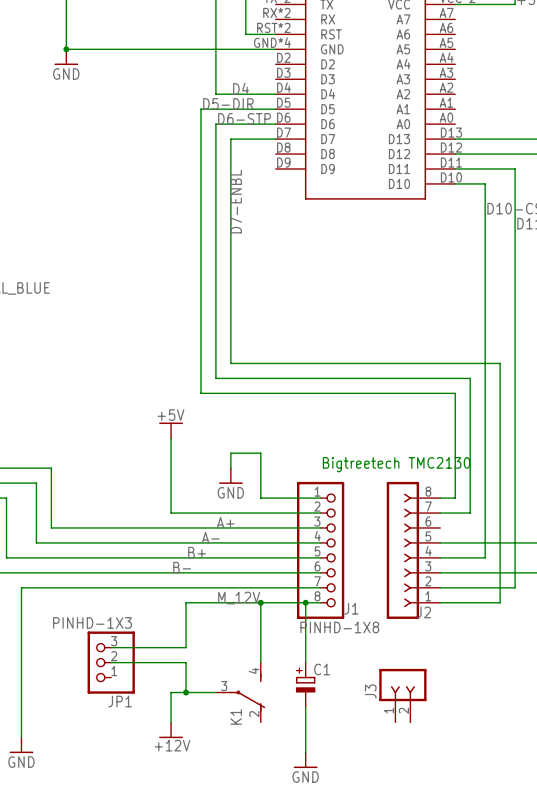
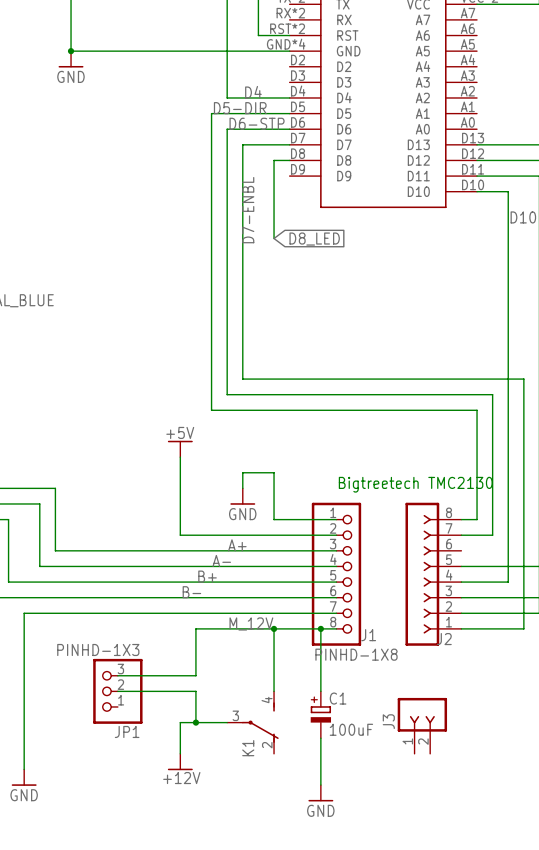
wire: none -> (289, 160) (274, 160) (274, 238)
global label: none -> D8_LED (314, 239)
C1 value: none -> 100uF (351, 729)

